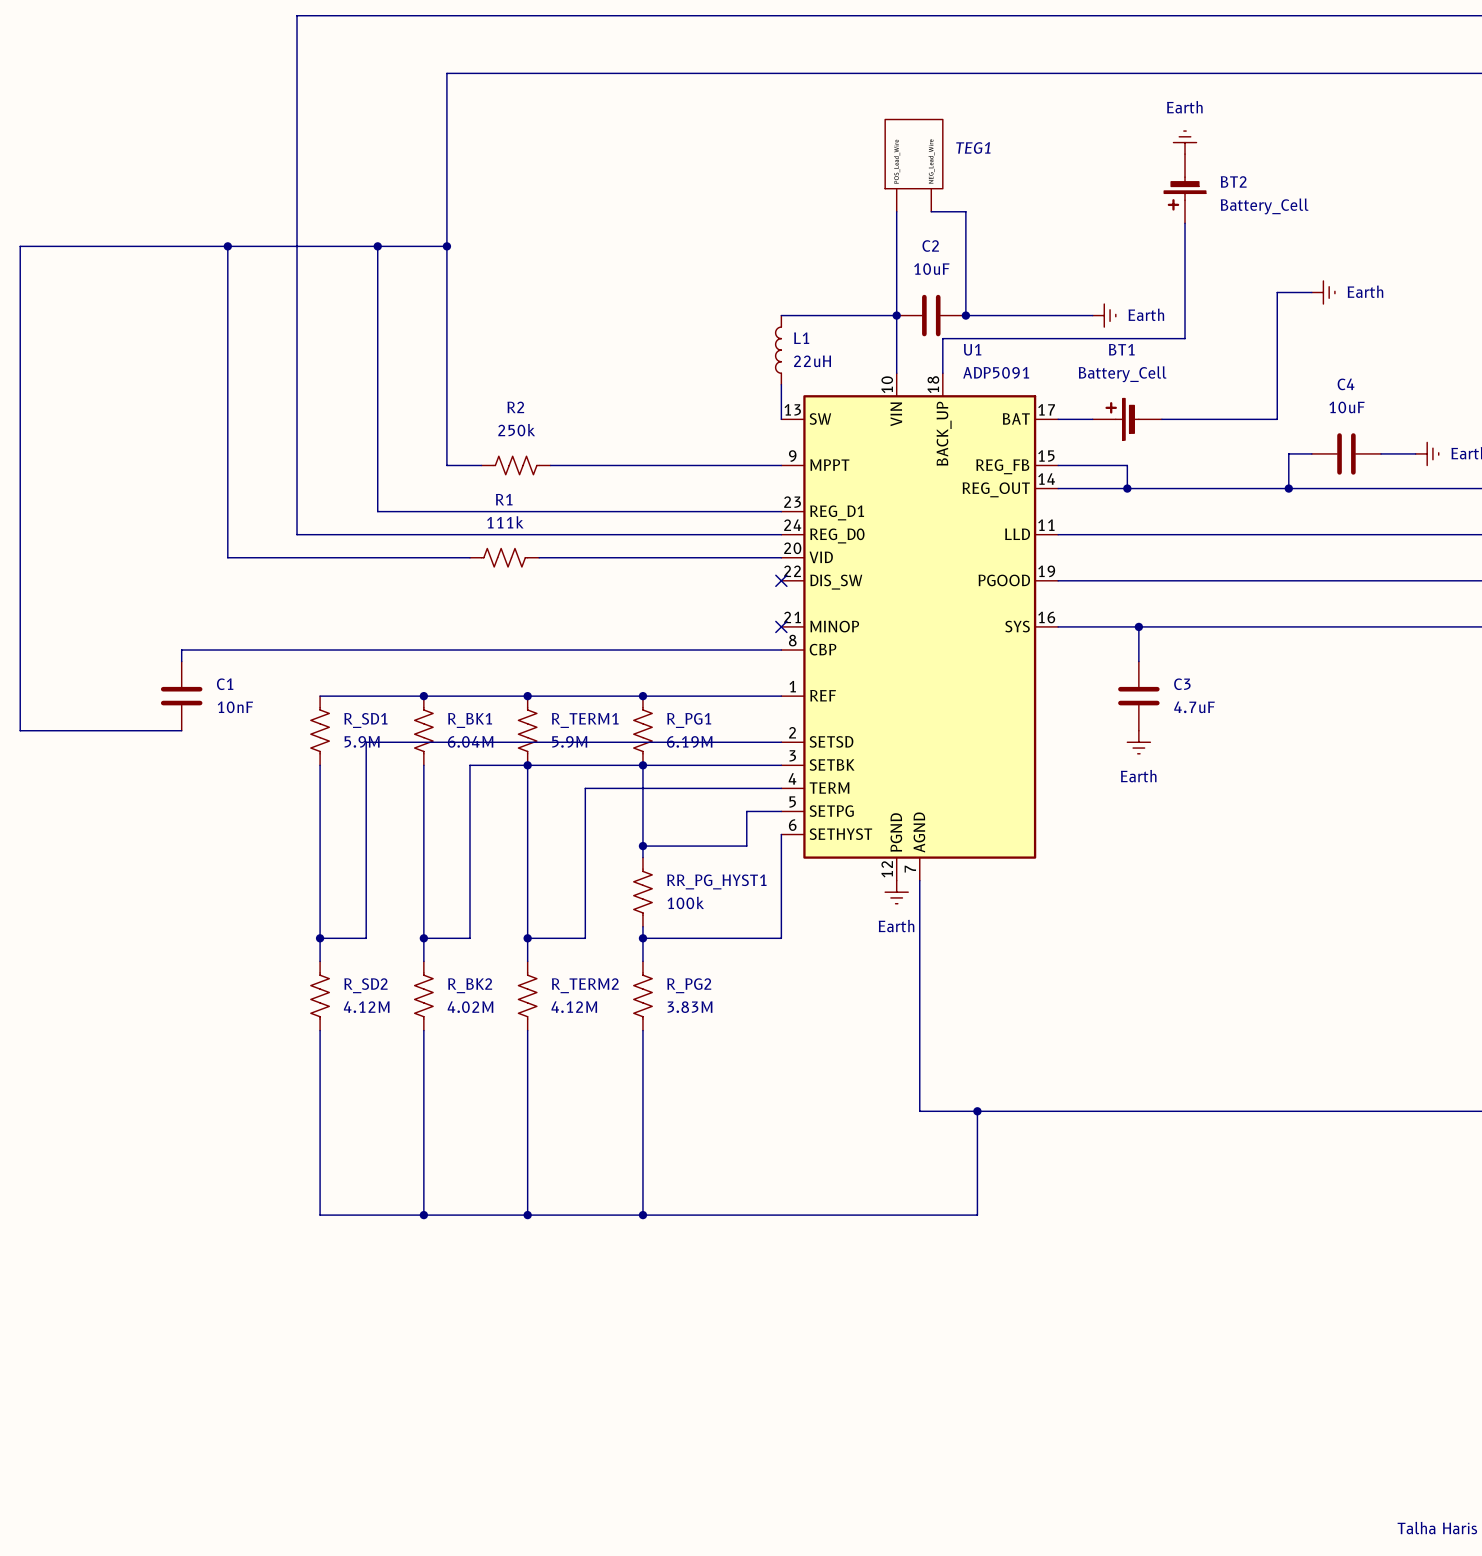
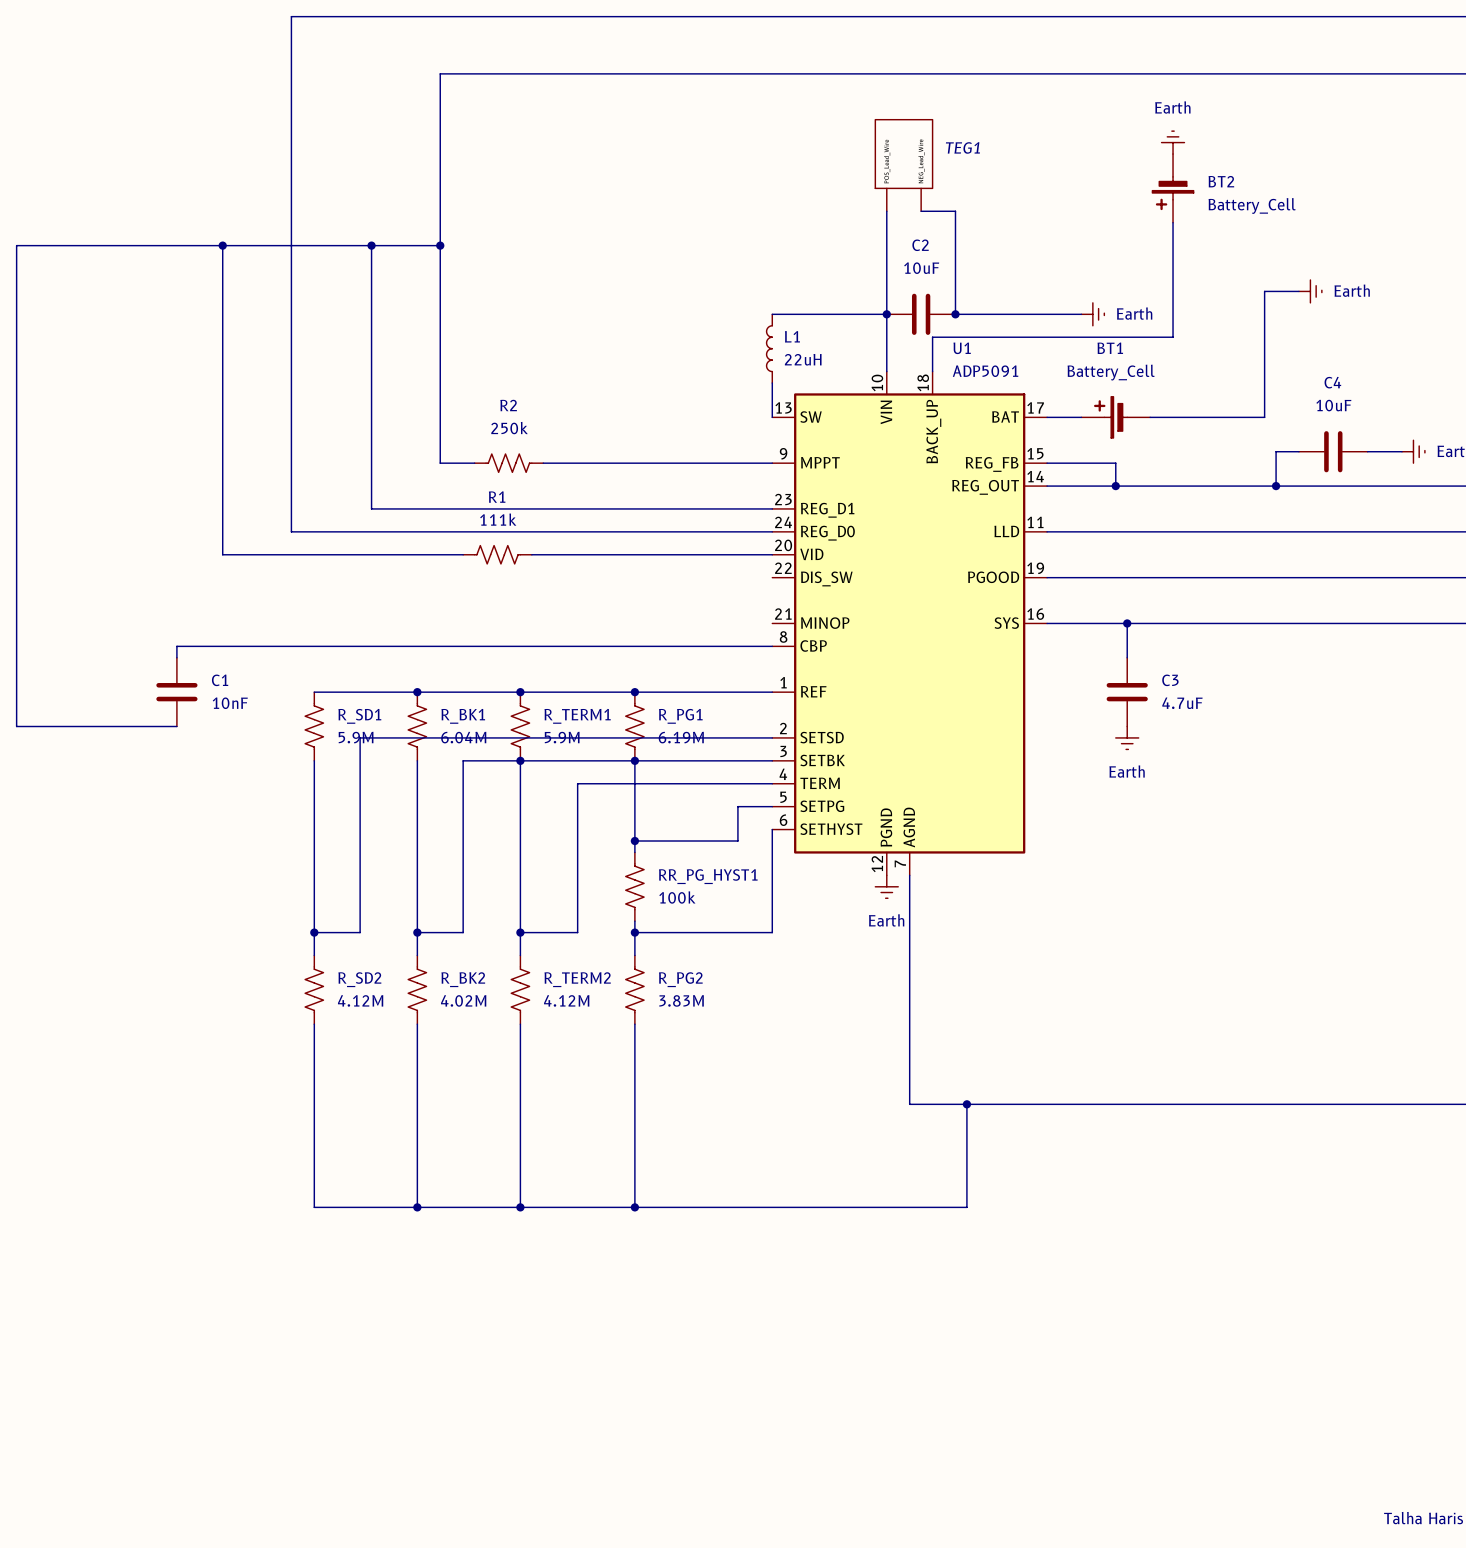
no-connect mark: (781, 580) -> none
no-connect mark: (781, 626) -> none

